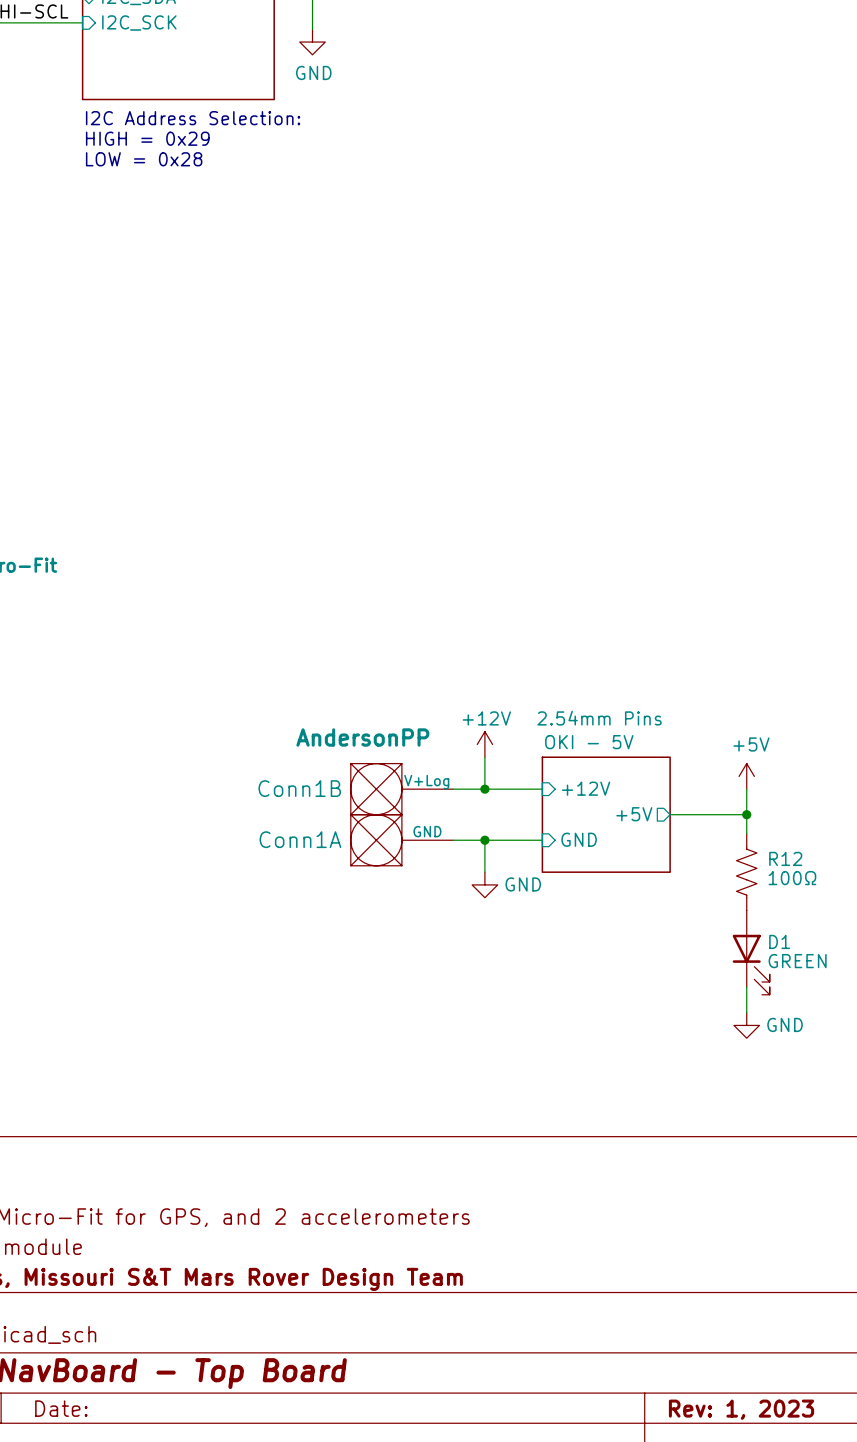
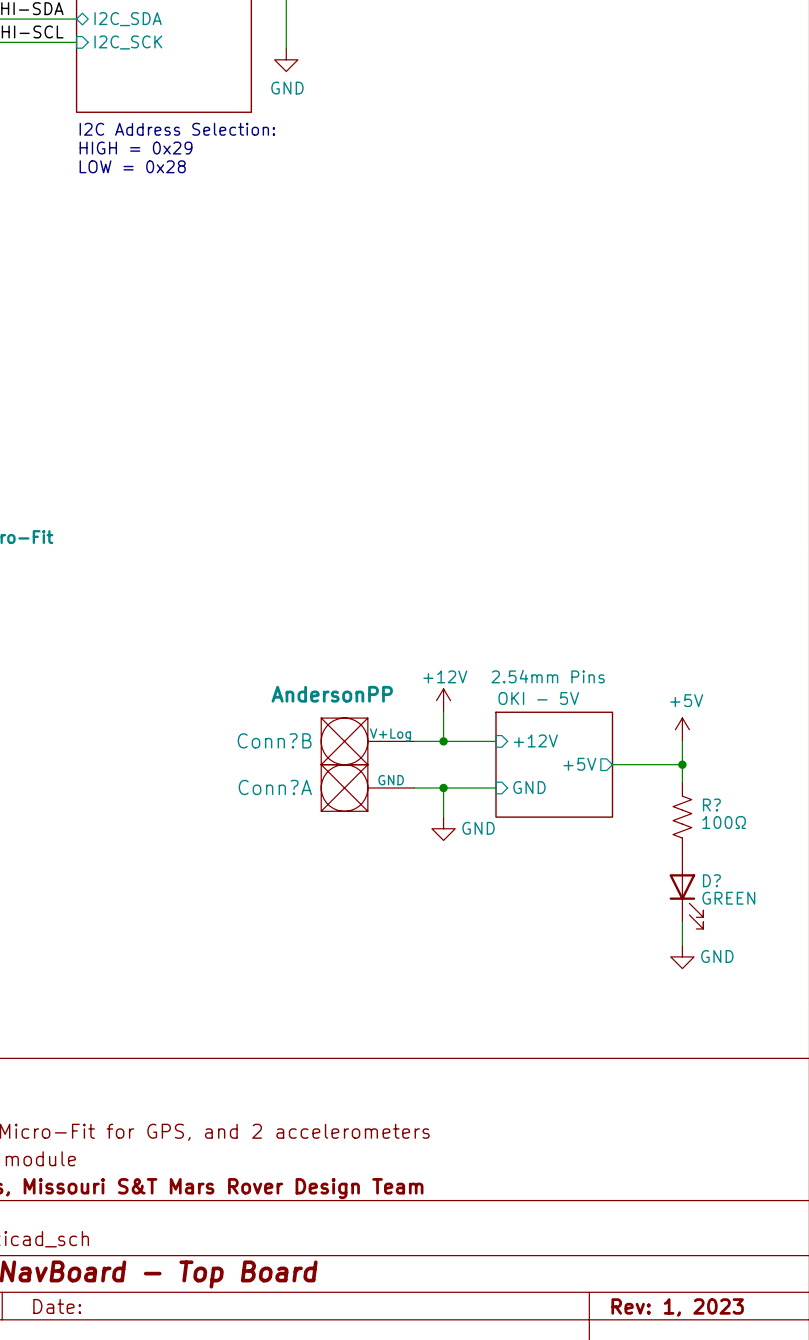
Conn1B name: Conn1B (299, 788) -> Conn?B (274, 740)
Conn1A name: Conn1A (300, 839) -> Conn?A (275, 787)
R12 name: R12 (785, 858) -> R? (711, 805)
D1 name: D1 (779, 941) -> D? (711, 880)

